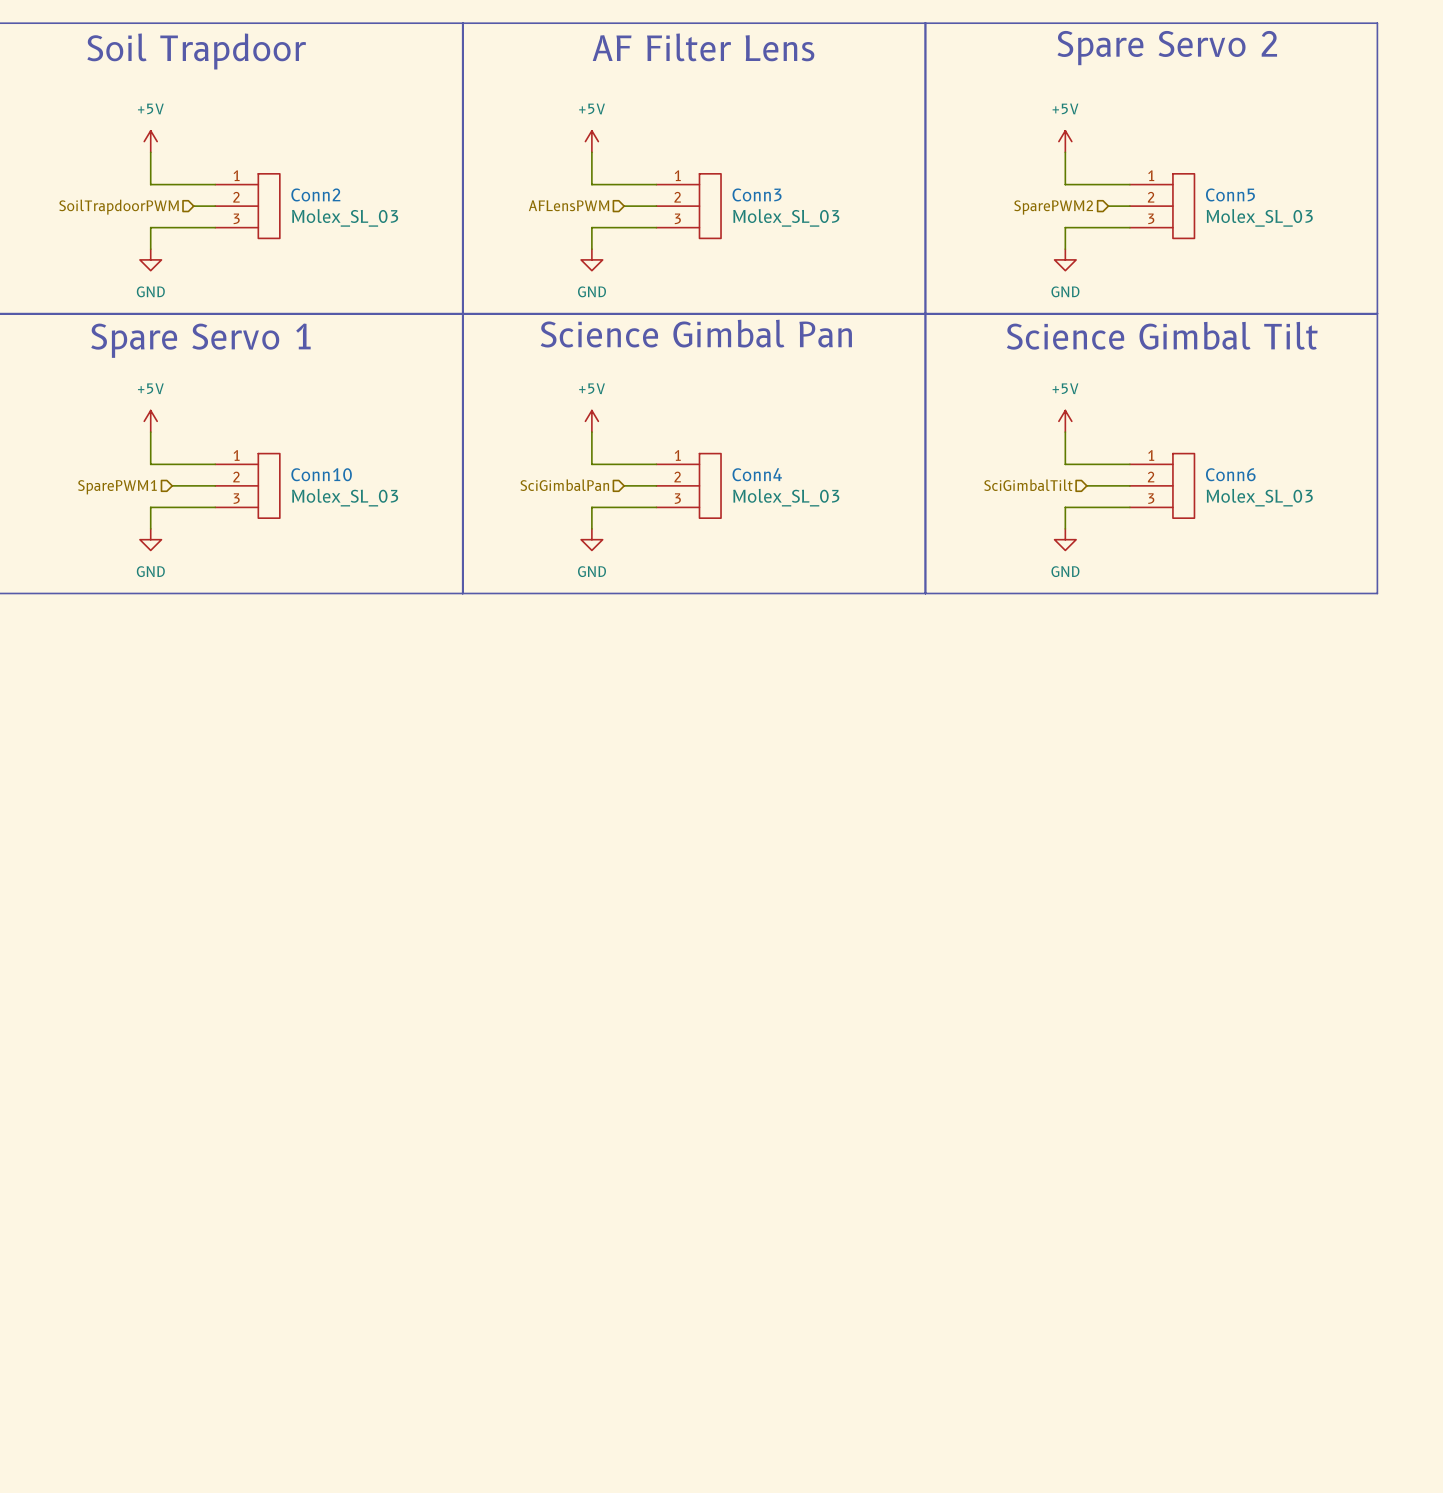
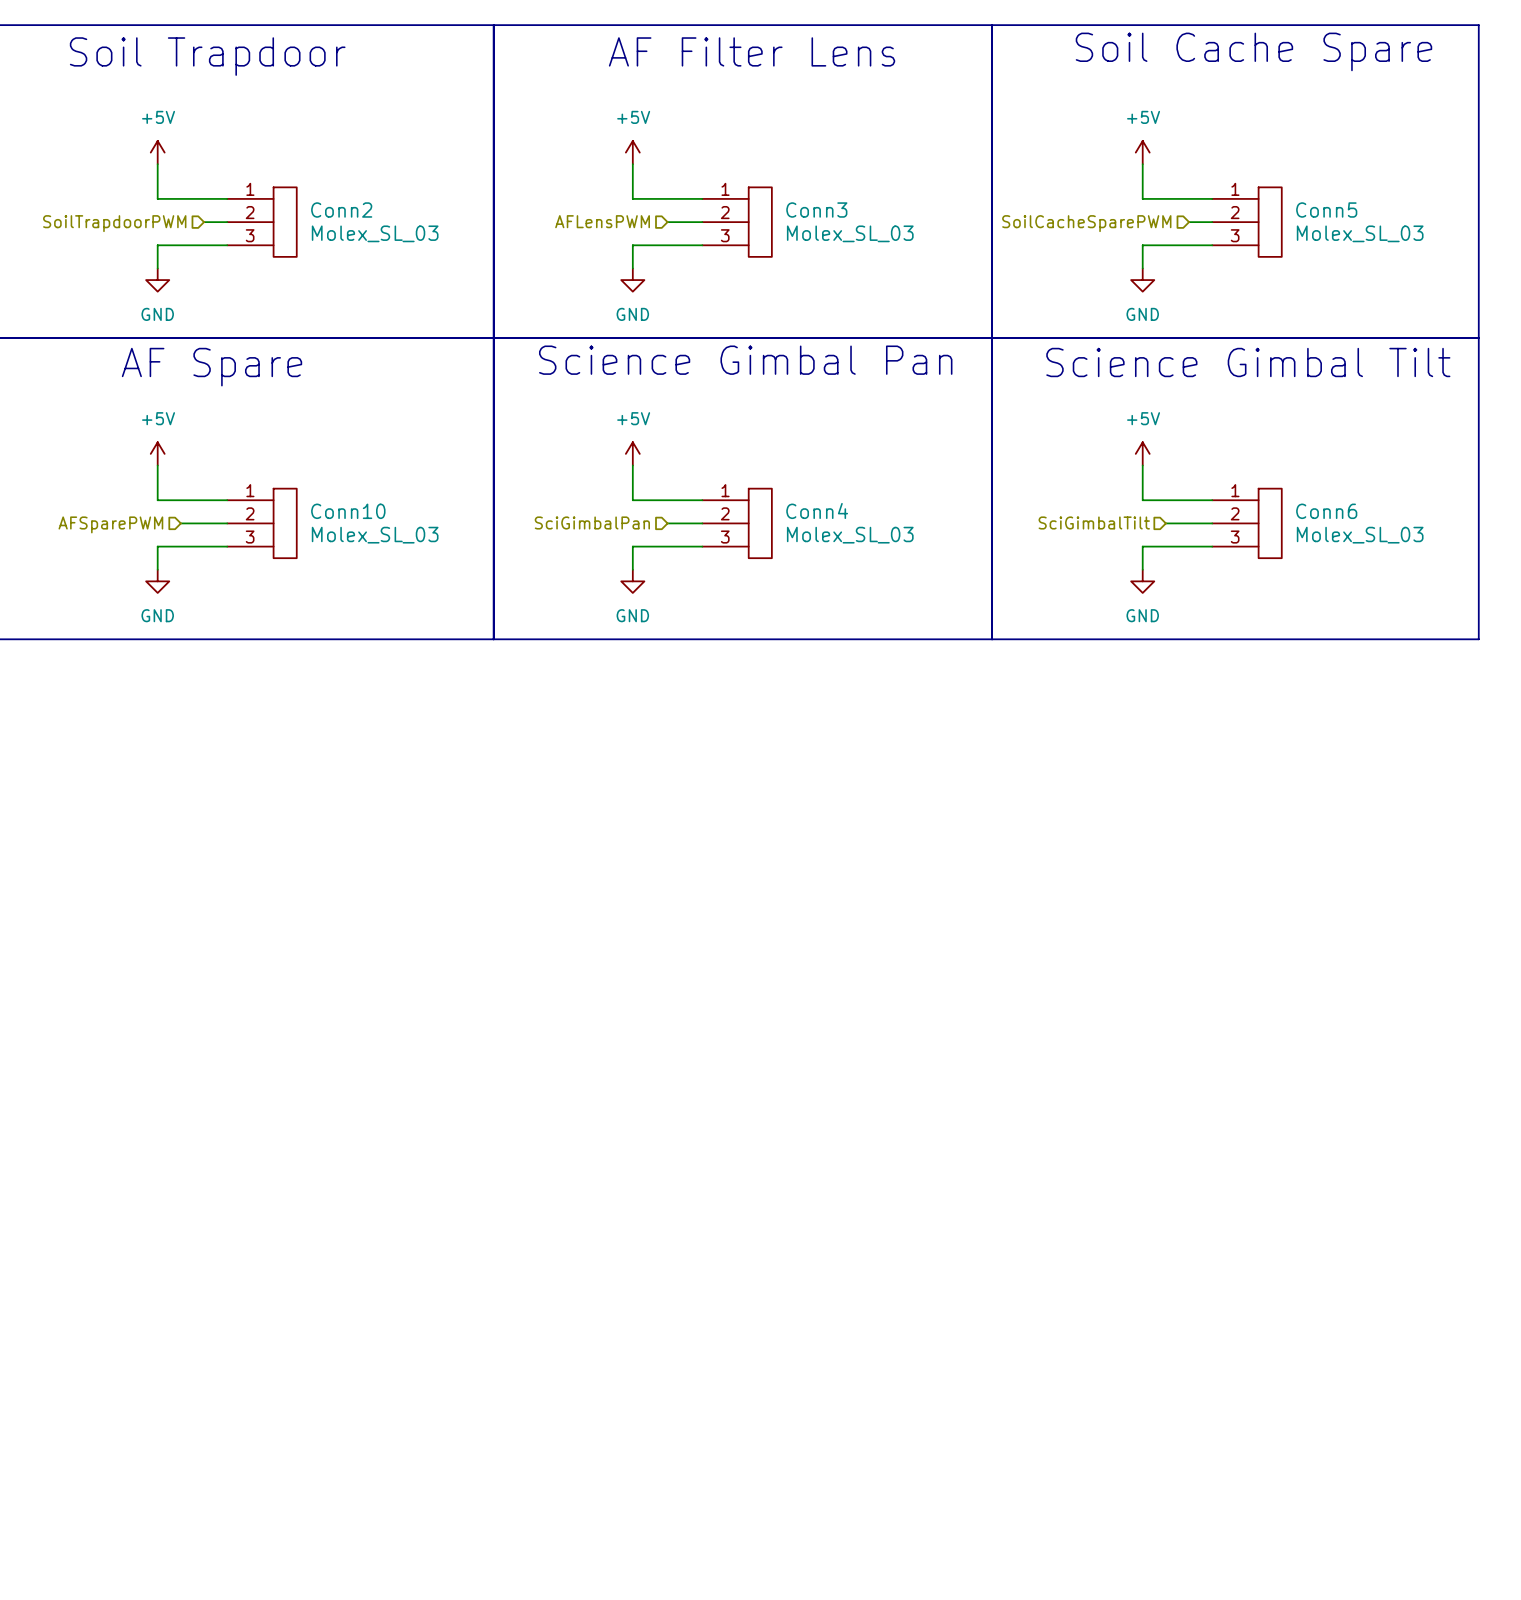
text: Spare Servo 2 (1167, 48) -> Soil Cache Spare (1253, 51)
hierarchical label: SparePWM2 (1053, 207) -> SoilCacheSparePWM (1086, 223)
text: Spare Servo 1 (200, 340) -> AF Spare (211, 367)
hierarchical label: SparePWM1 (117, 487) -> AFSparePWM (110, 524)

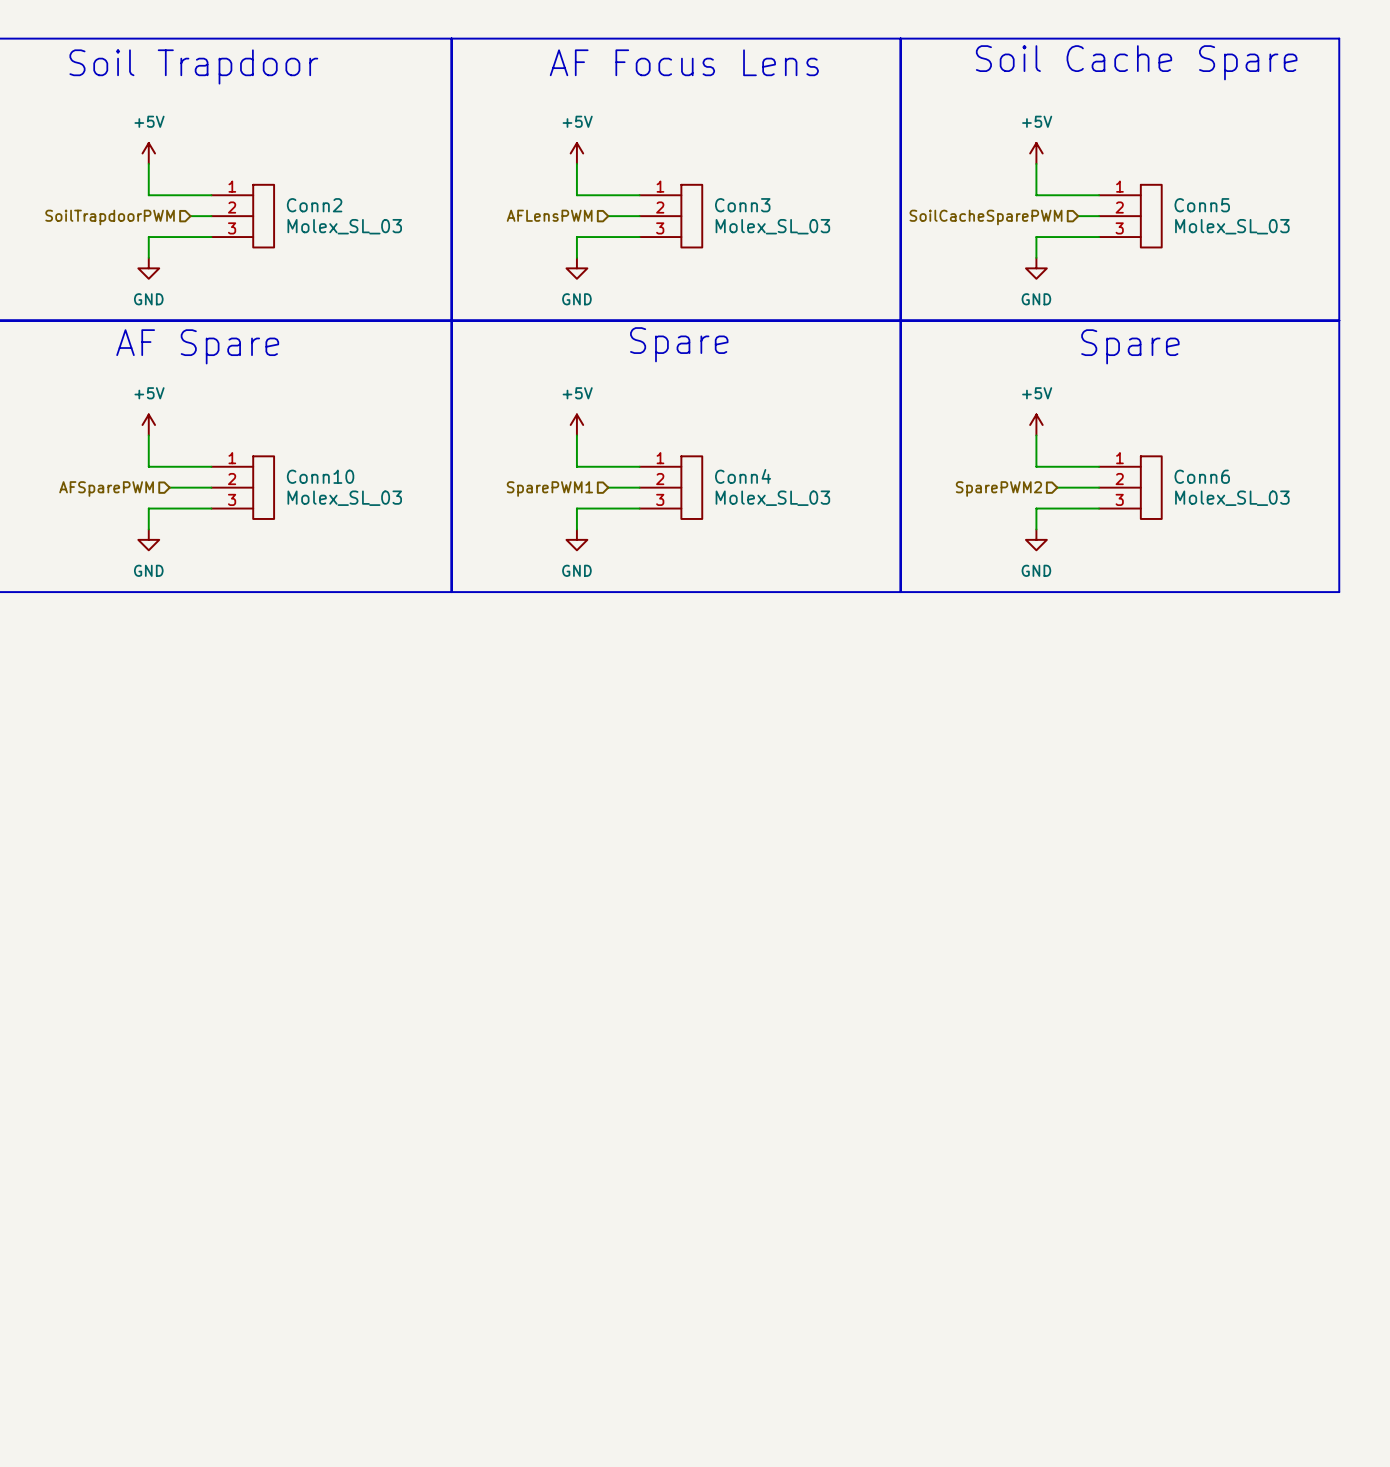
text: AF Filter Lens (752, 51) -> AF Focus Lens (684, 62)
text: Science Gimbal Pan (745, 360) -> Spare (679, 344)
text: Science Gimbal Tilt (1248, 362) -> Spare (1130, 346)
hierarchical label: SciGimbalPan (592, 522) -> SparePWM1 (549, 489)
hierarchical label: SciGimbalTilt (1094, 522) -> SparePWM2 (998, 489)

